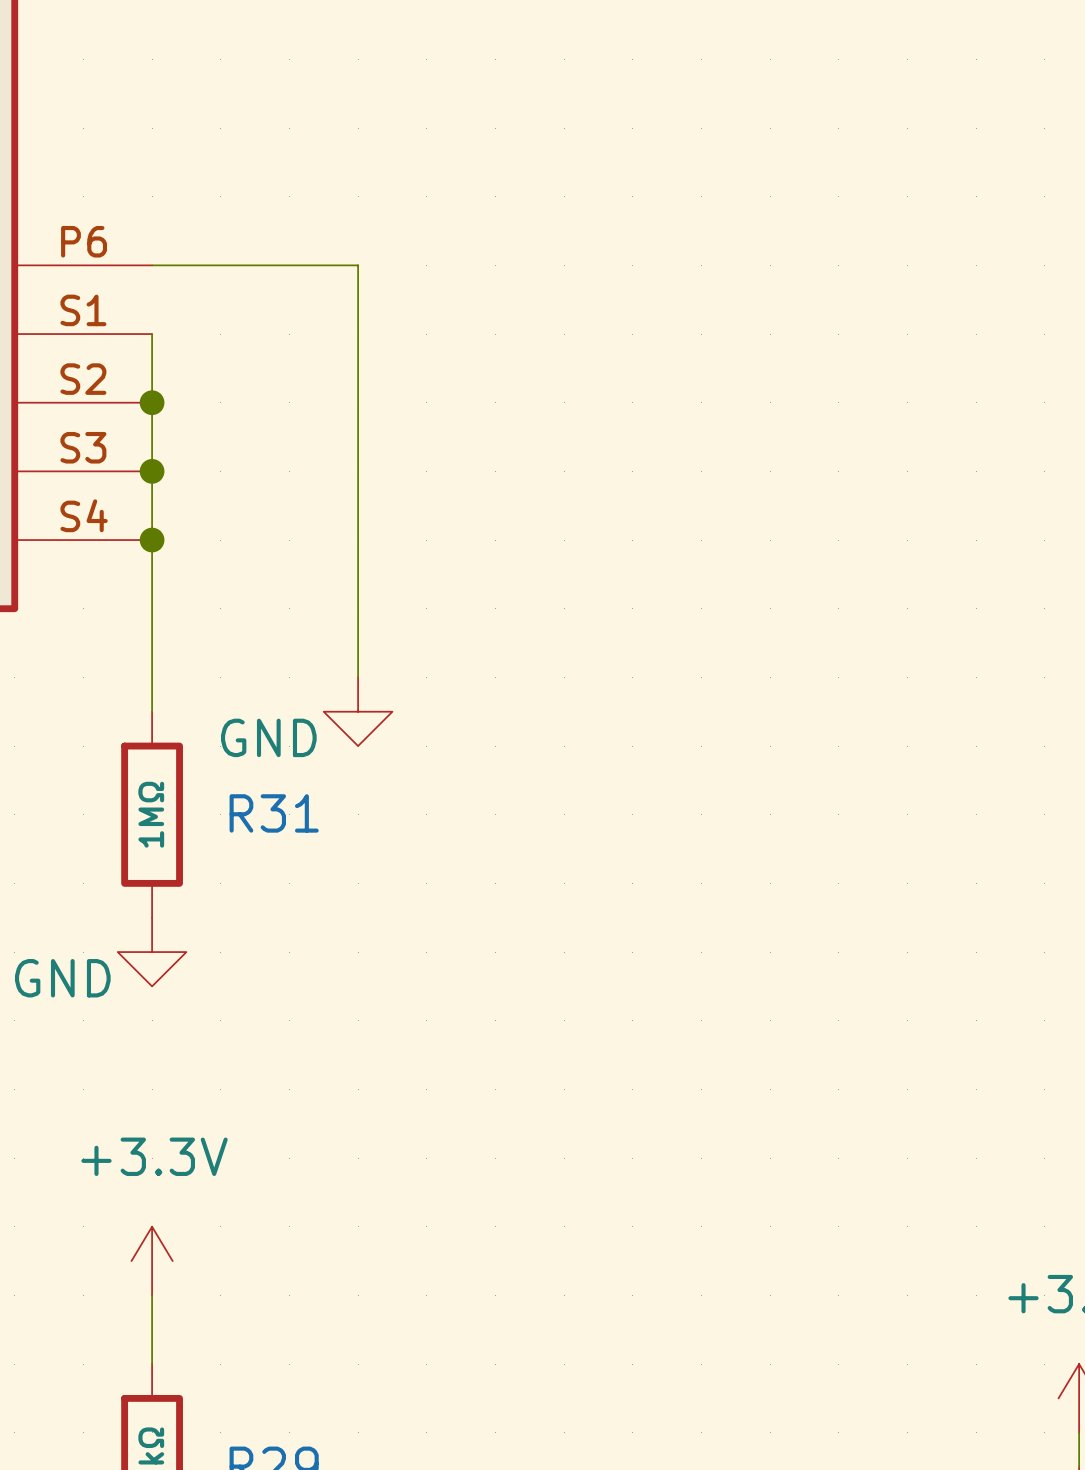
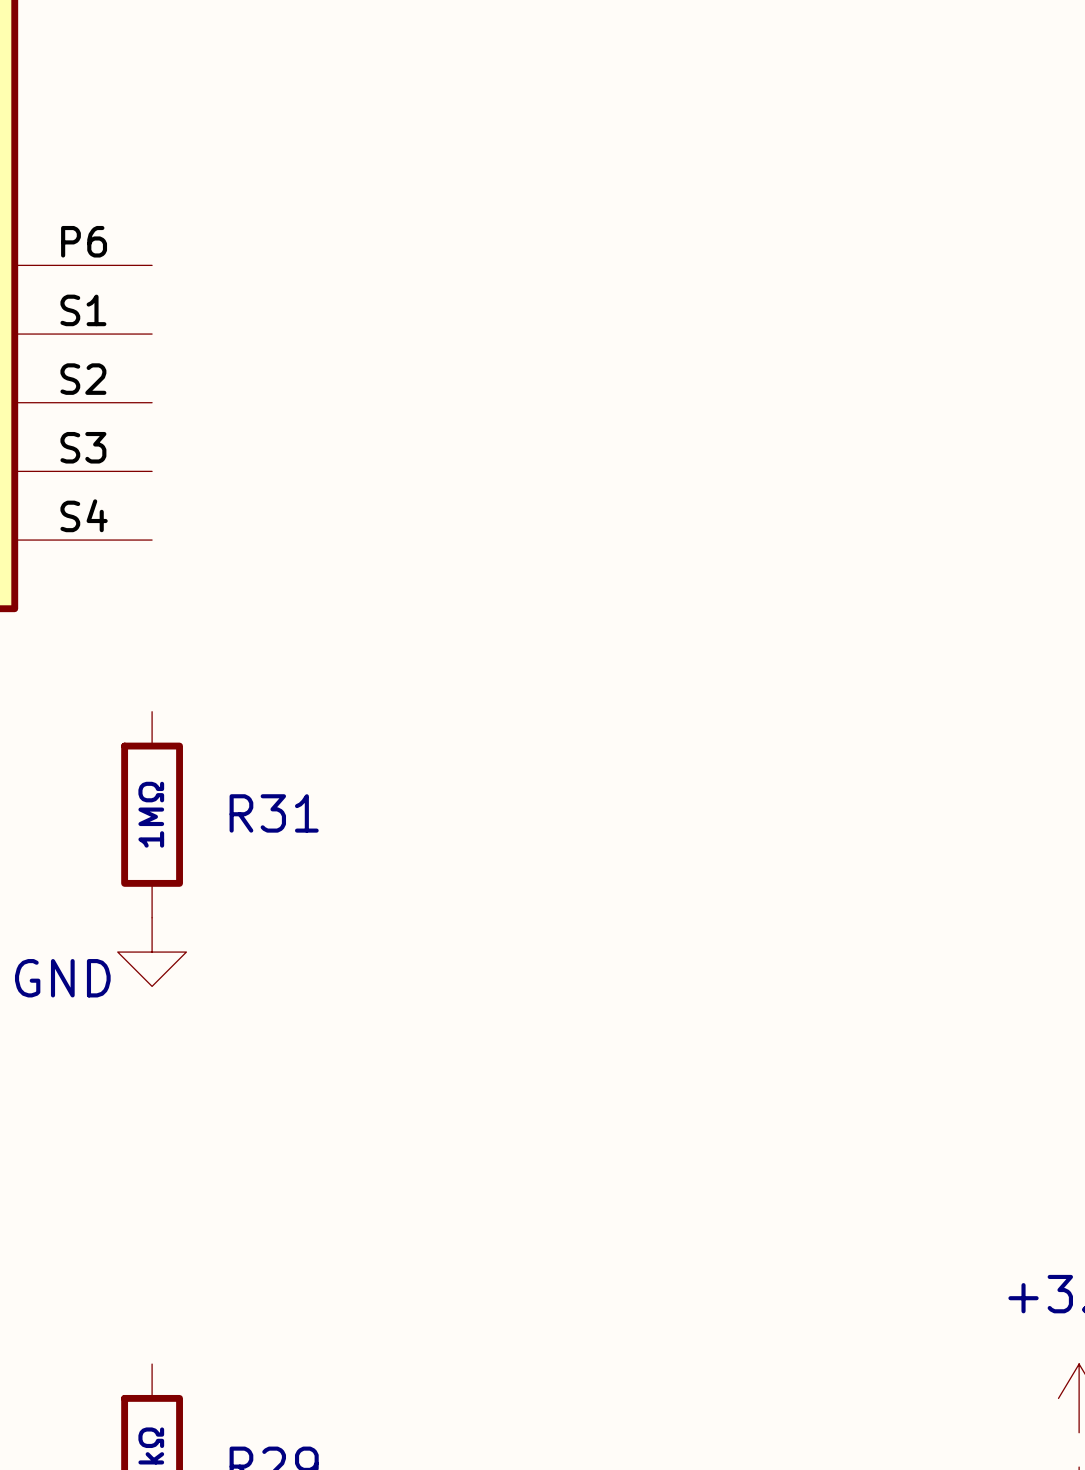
wire: (152, 265) (358, 265) (358, 677) -> none
wire: (152, 334) (152, 711) -> none
junction: (152, 402) -> none
junction: (152, 471) -> none
junction: (152, 540) -> none
power symbol: GND (358, 711) -> none
power symbol: +3.3V (152, 1261) -> none
wire: (152, 1295) (152, 1364) -> none
wire: (1079, 1432) (1079, 1467) -> none

